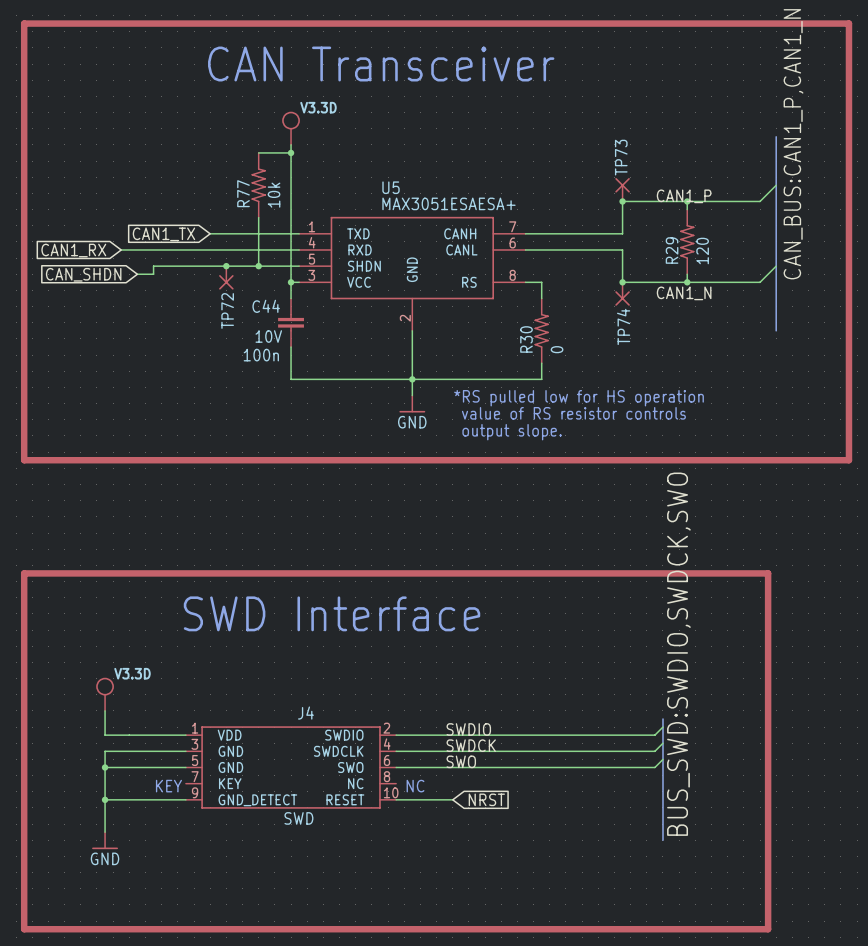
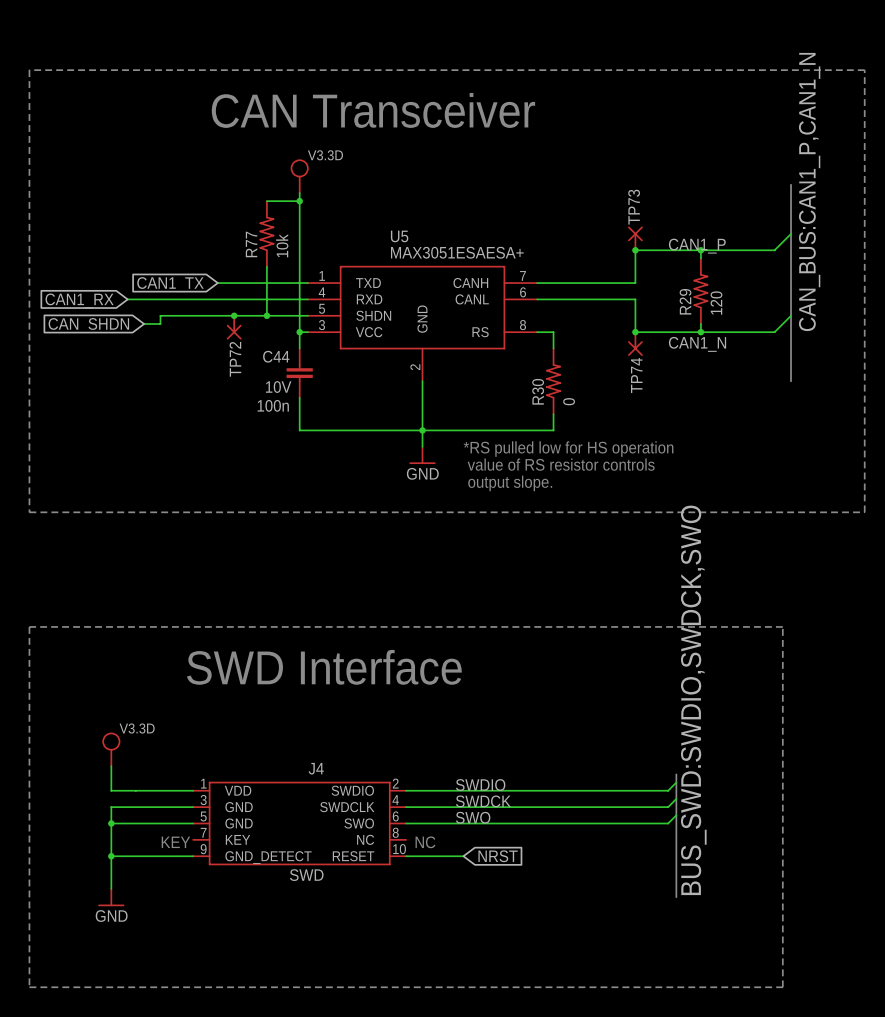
line: (24, 23) (24, 460) (848, 460) (848, 23) (24, 23) -> none
line: none -> (29, 70) (29, 512) (864, 512) (864, 70) (29, 70)
line: (24, 573) (24, 929) (768, 929) (768, 573) (24, 573) -> none
line: none -> (29, 626) (29, 987) (782, 987) (782, 626) (29, 626)

